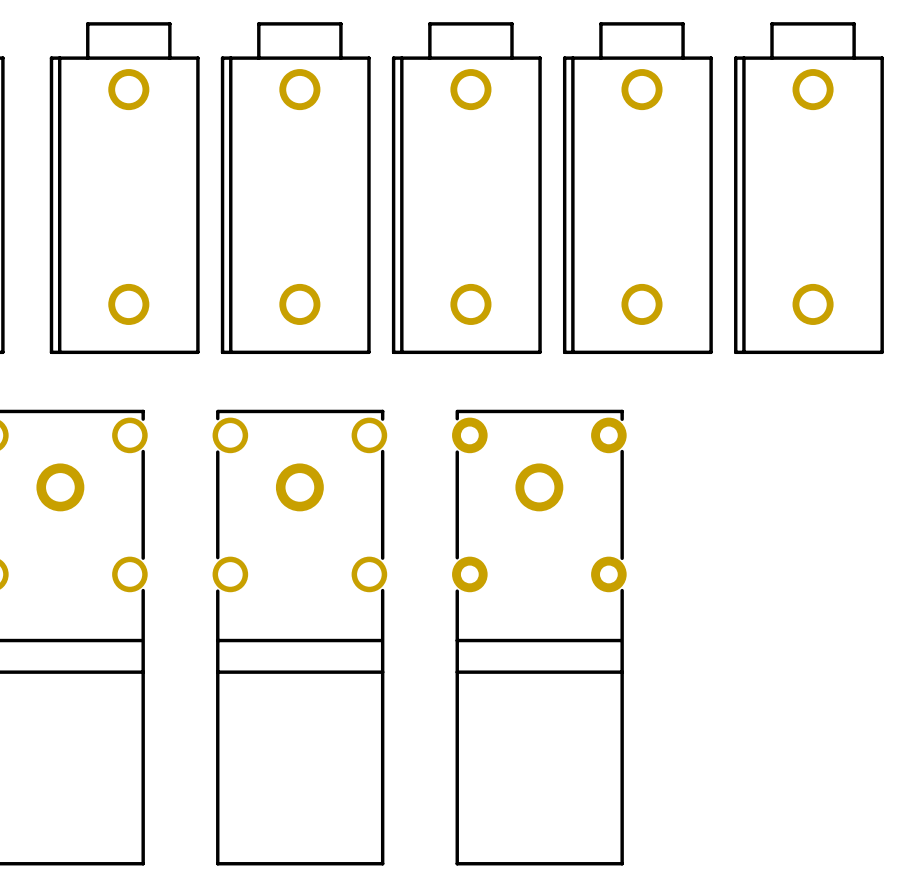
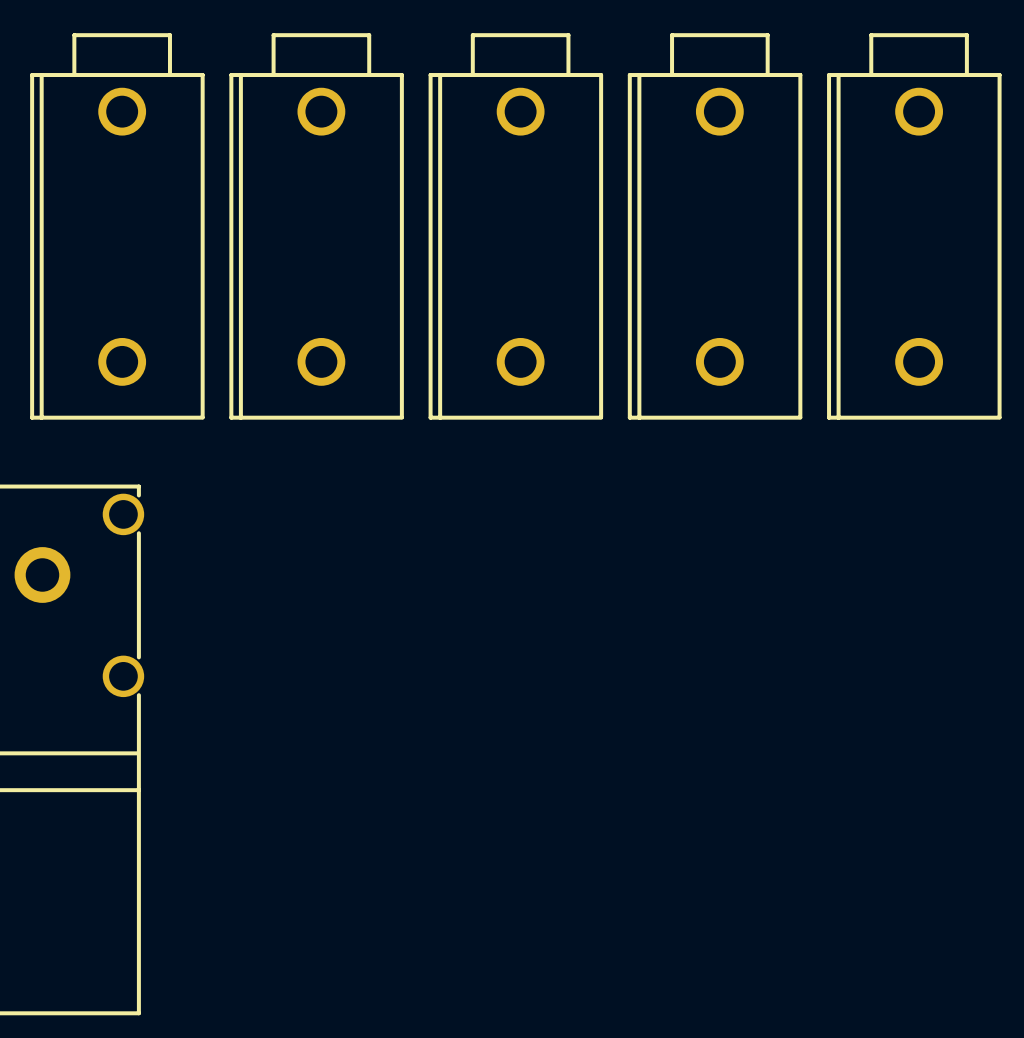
part: (299, 637) -> none
part: (539, 637) -> none

